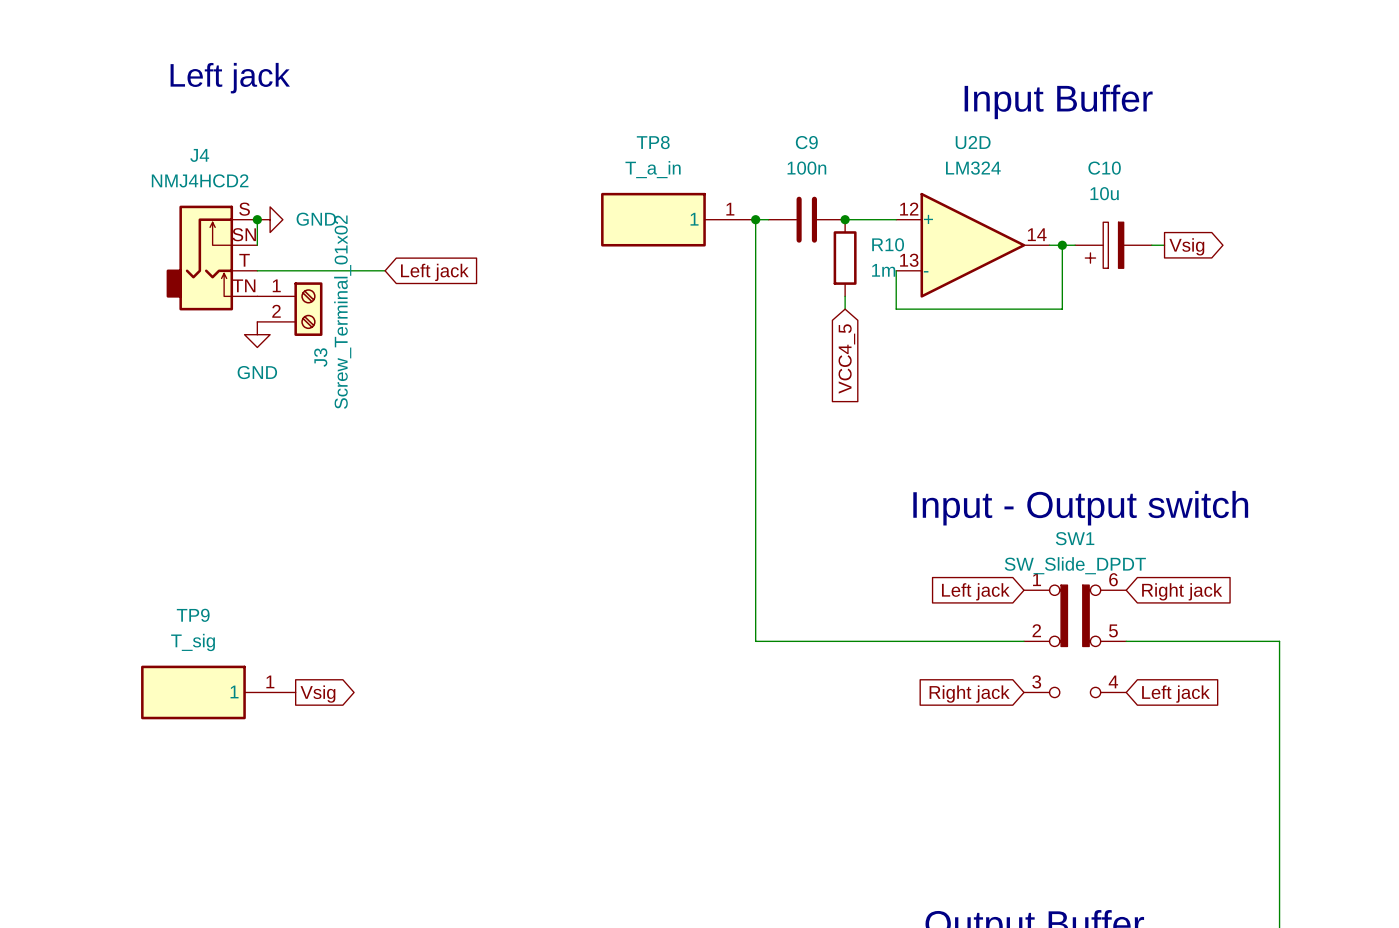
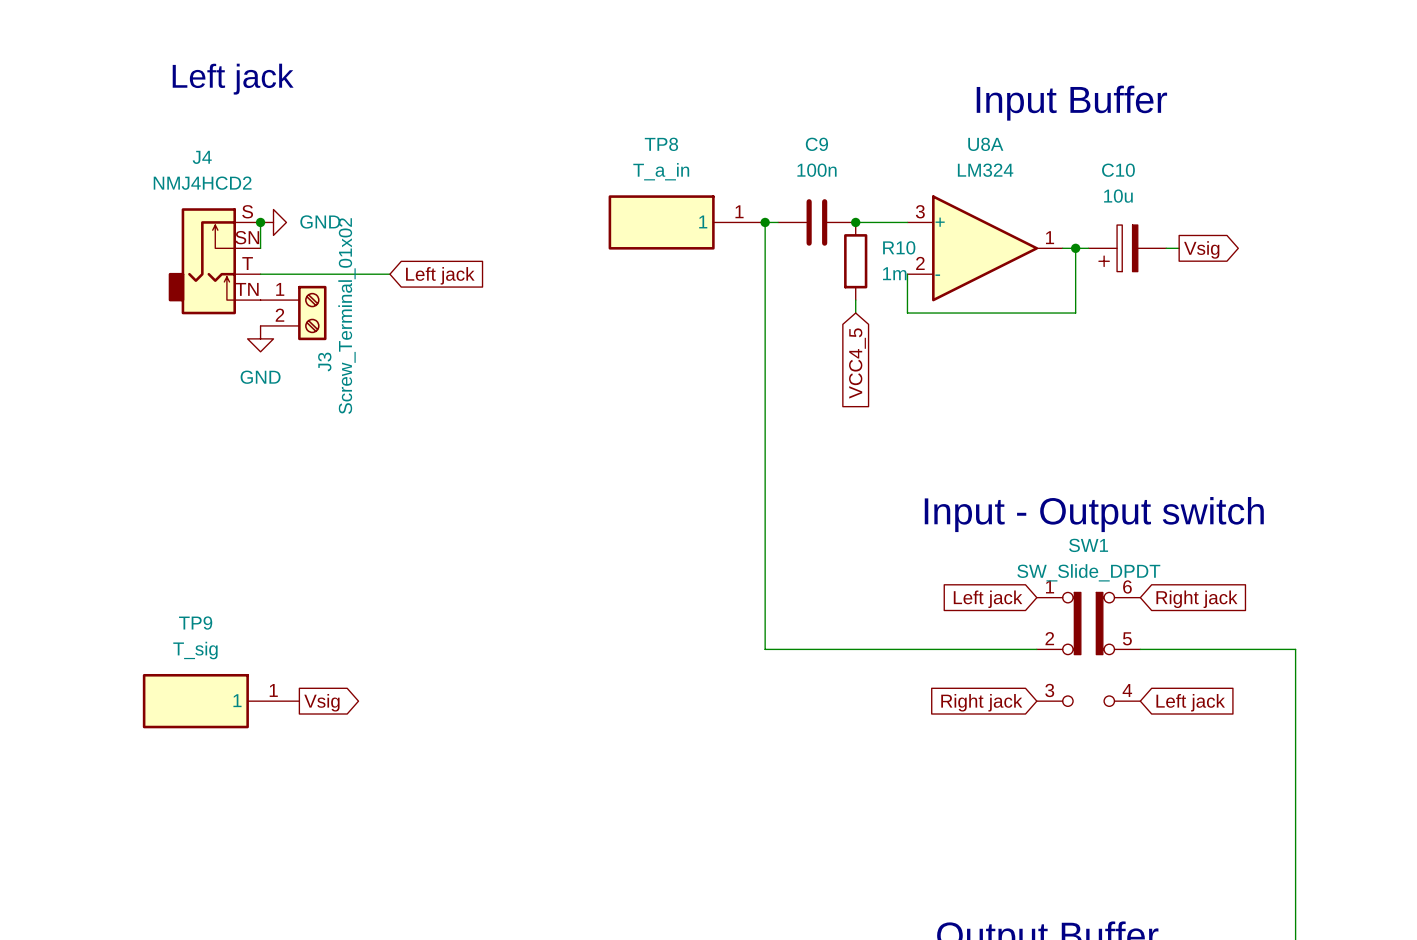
U2D name: U2D (973, 142) -> U8A (985, 144)
U2D pin number: 12 (909, 209) -> 3 (920, 211)
U2D pin number: 14 (1037, 234) -> 1 (1050, 237)
U2D pin number: 13 (909, 260) -> 2 (920, 263)

